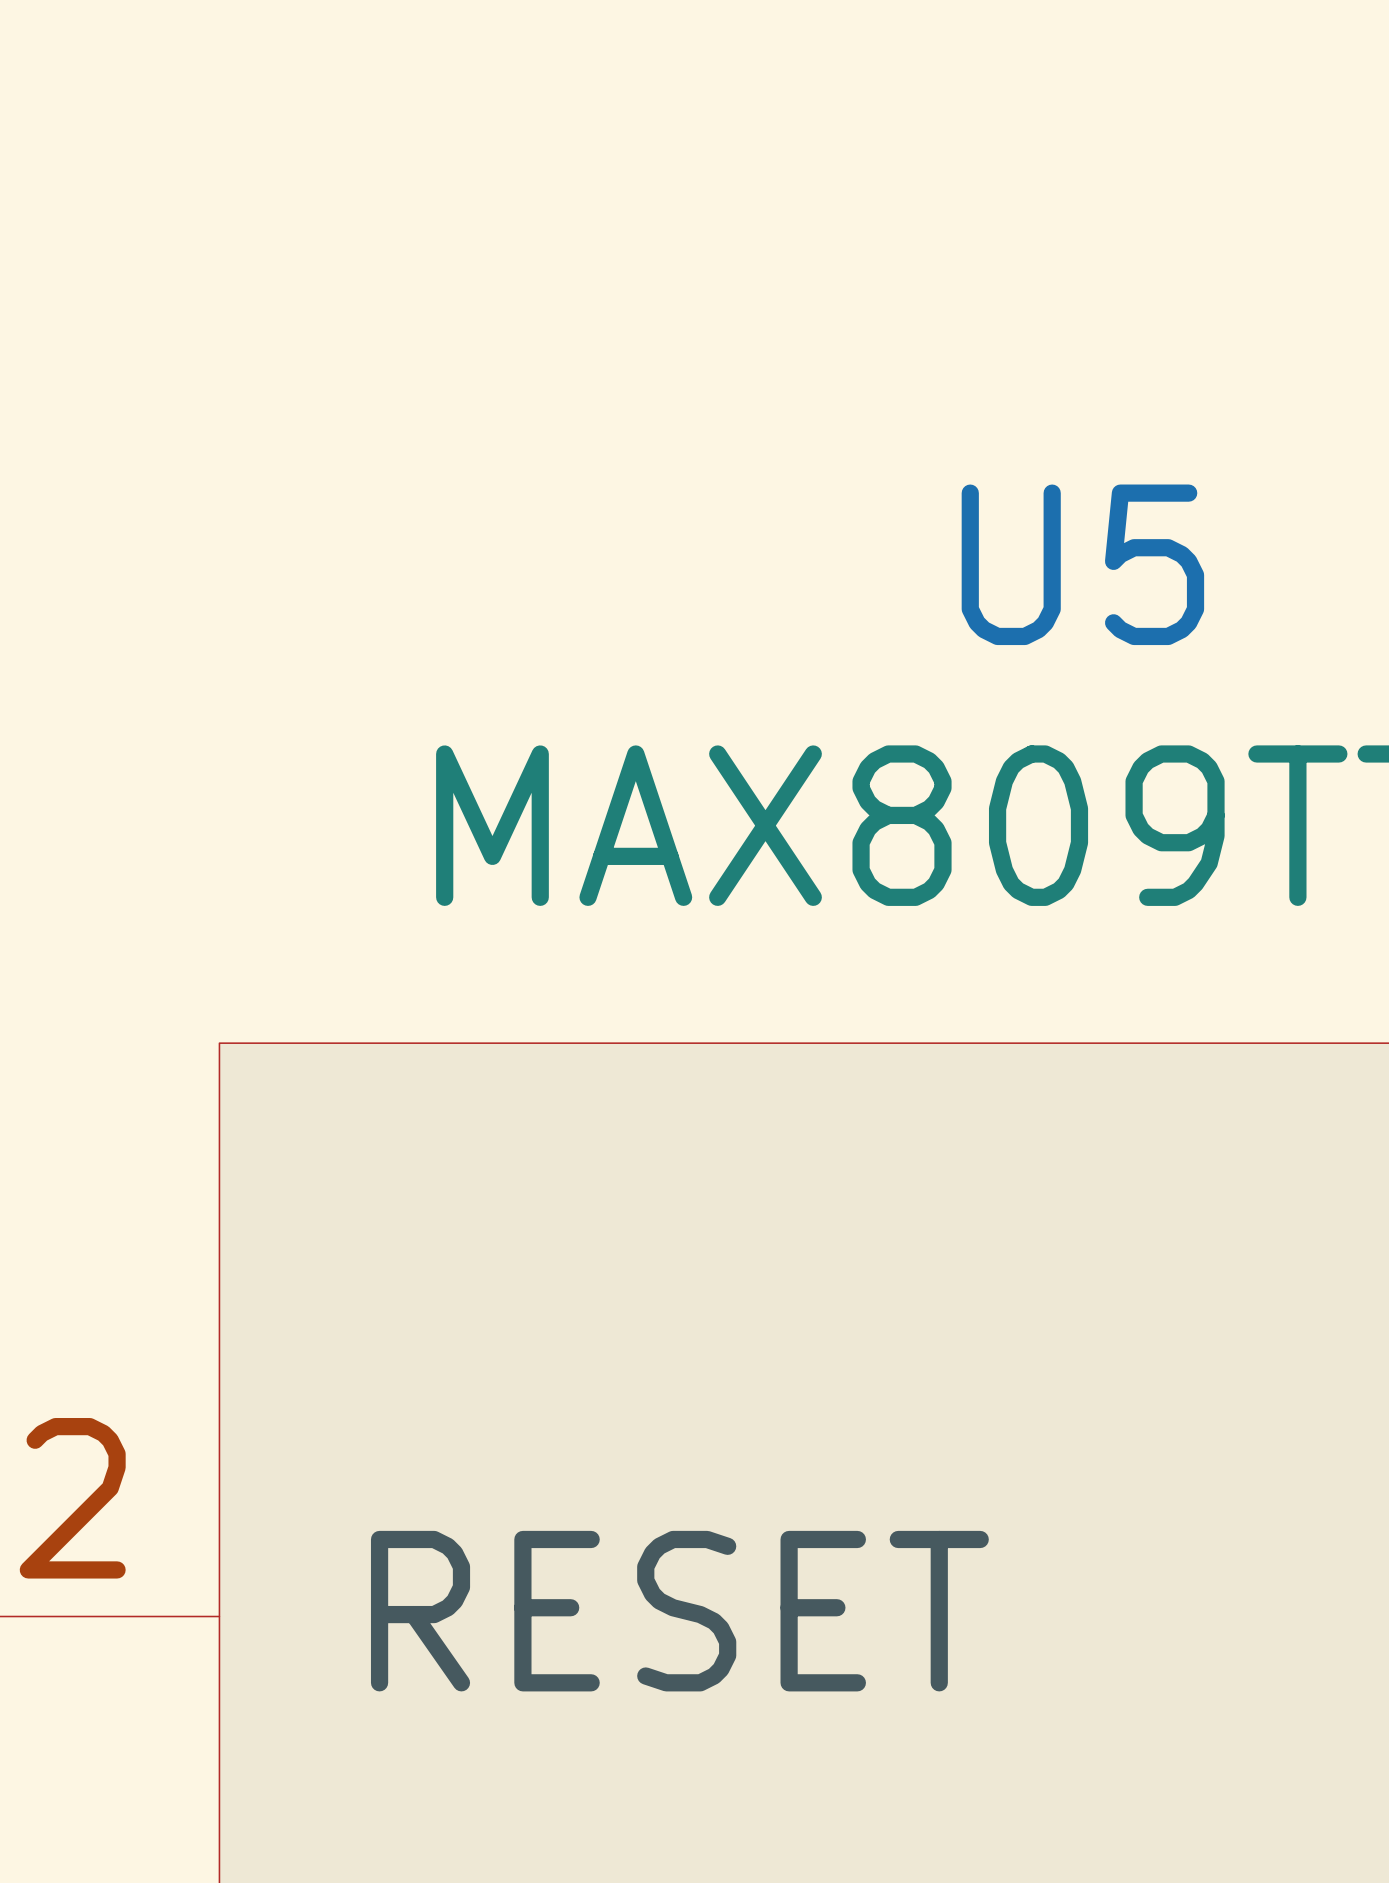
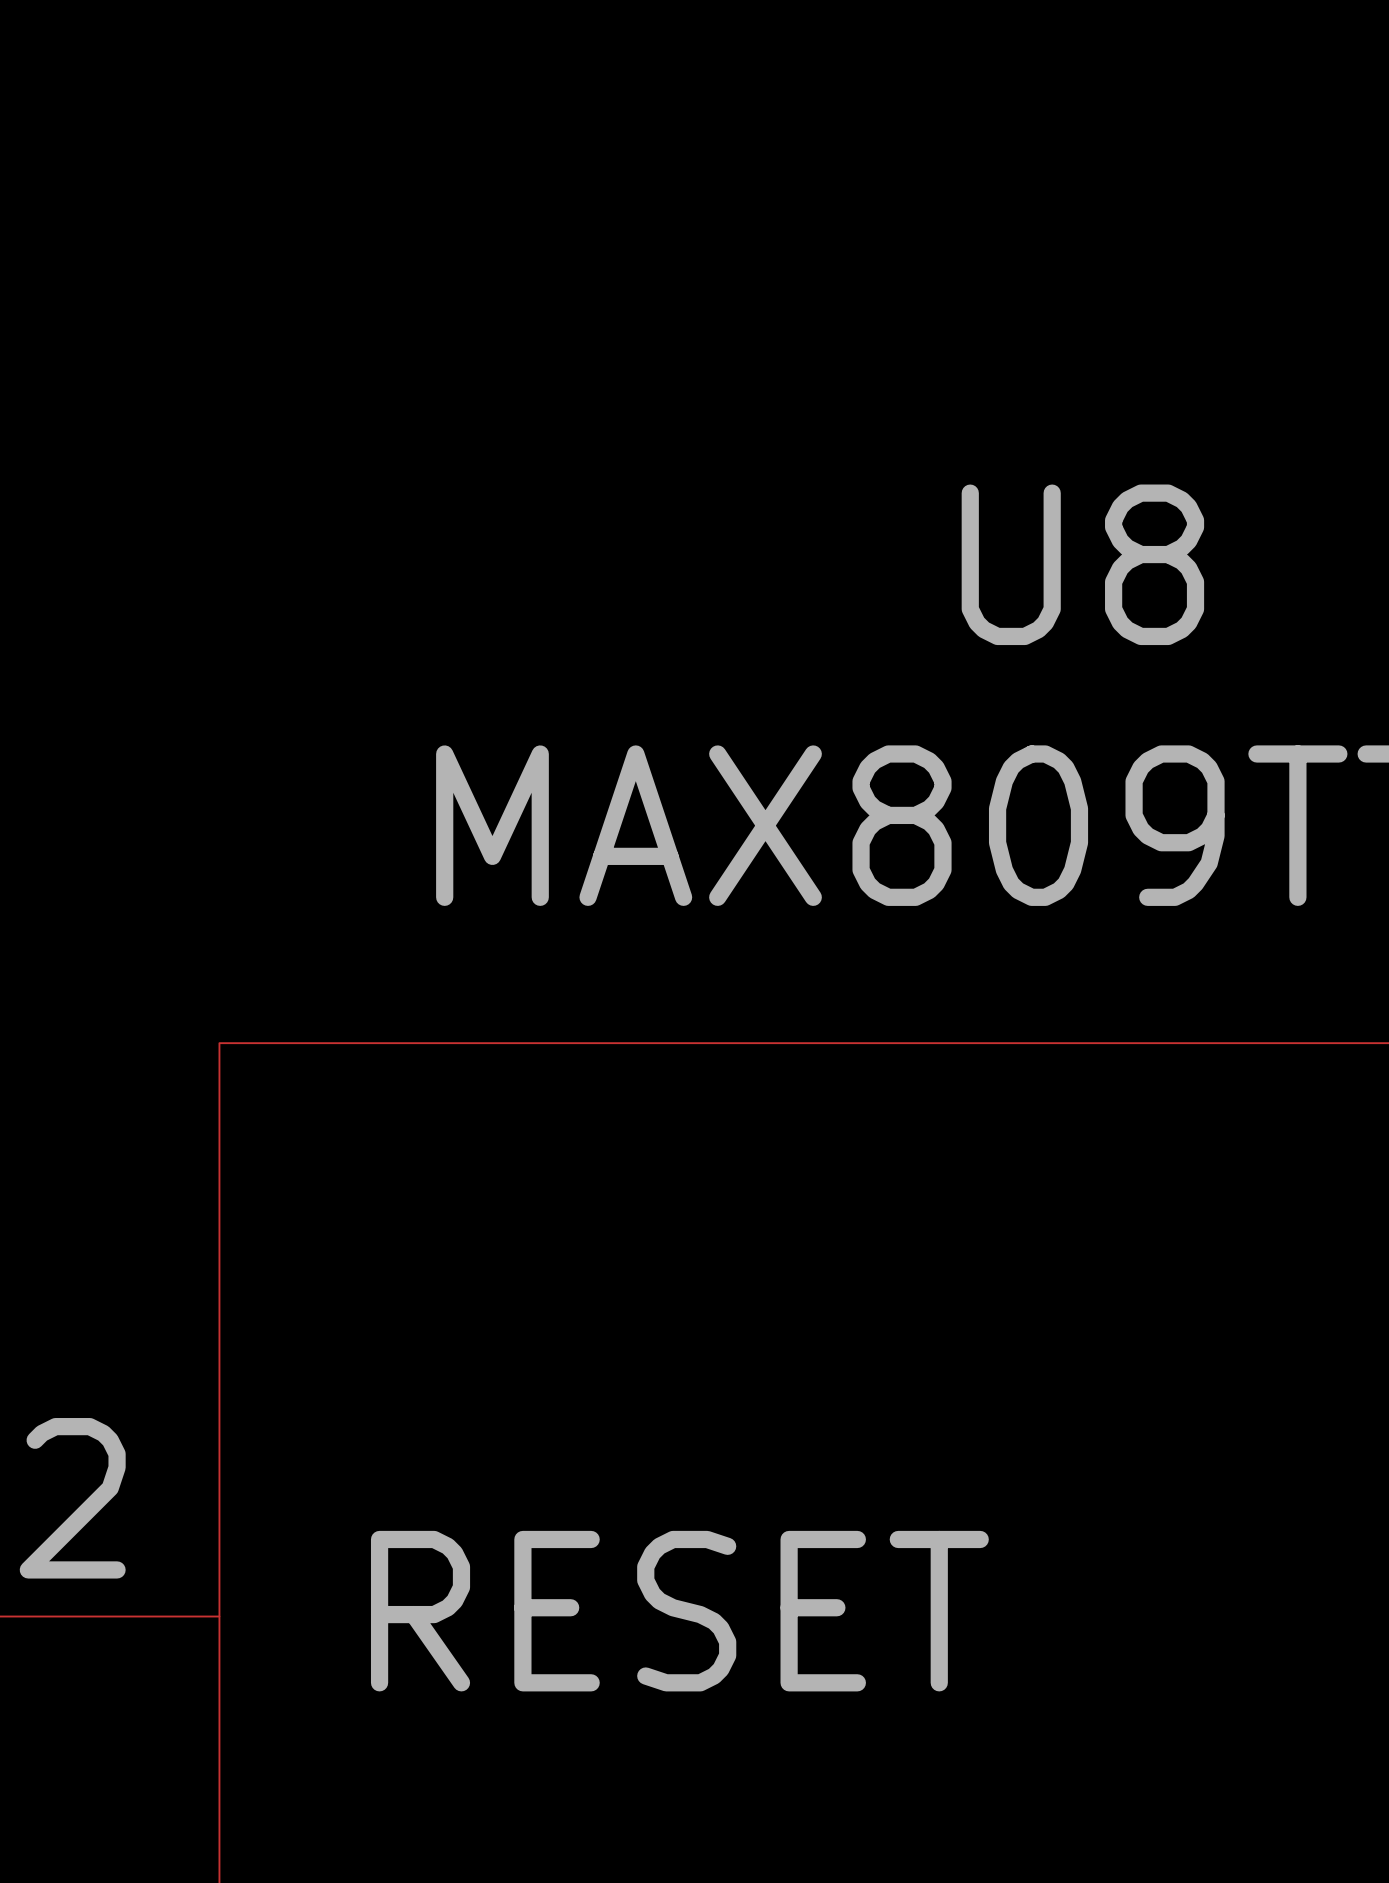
U5 name: U5 (1082, 564) -> U8 (1082, 564)

